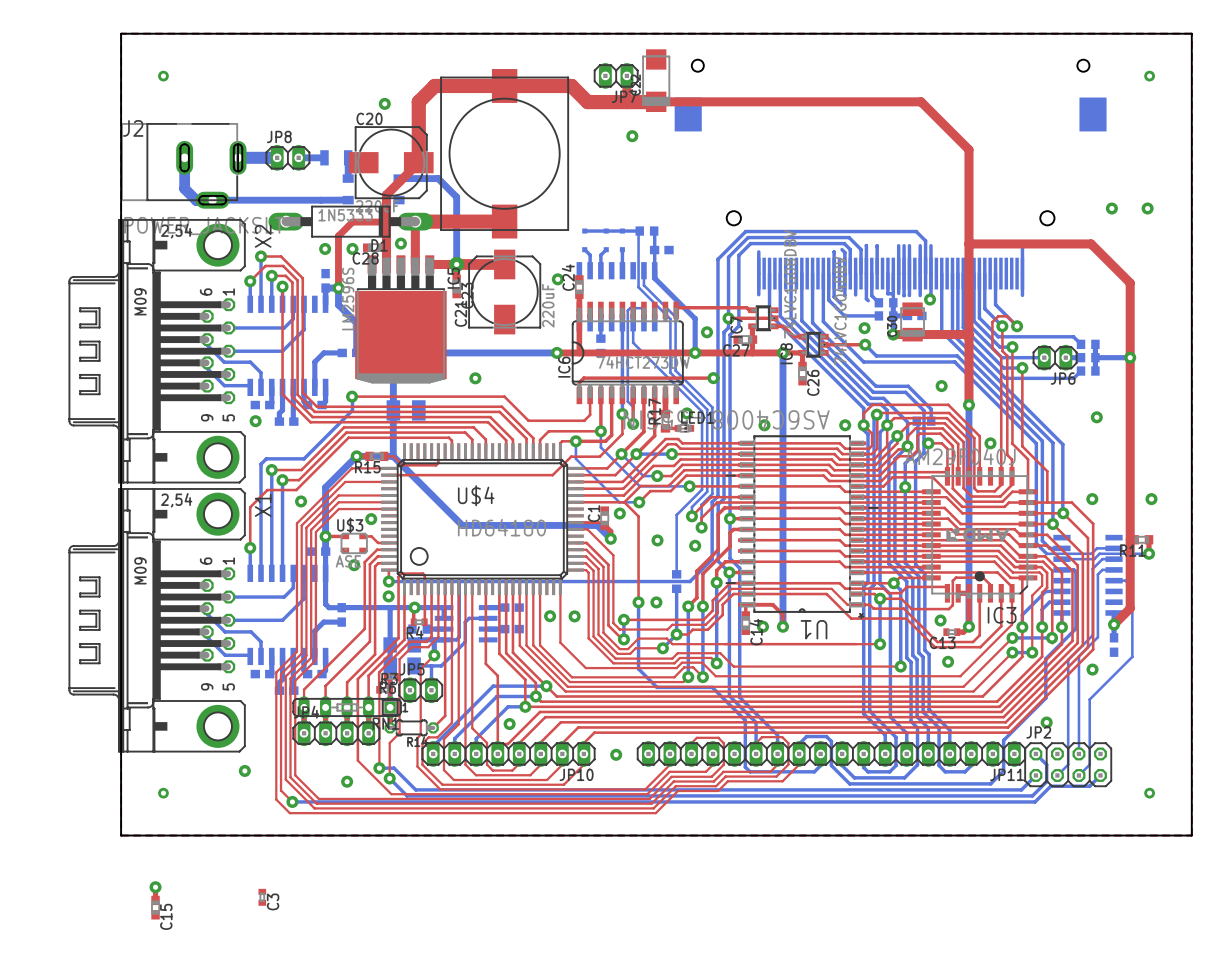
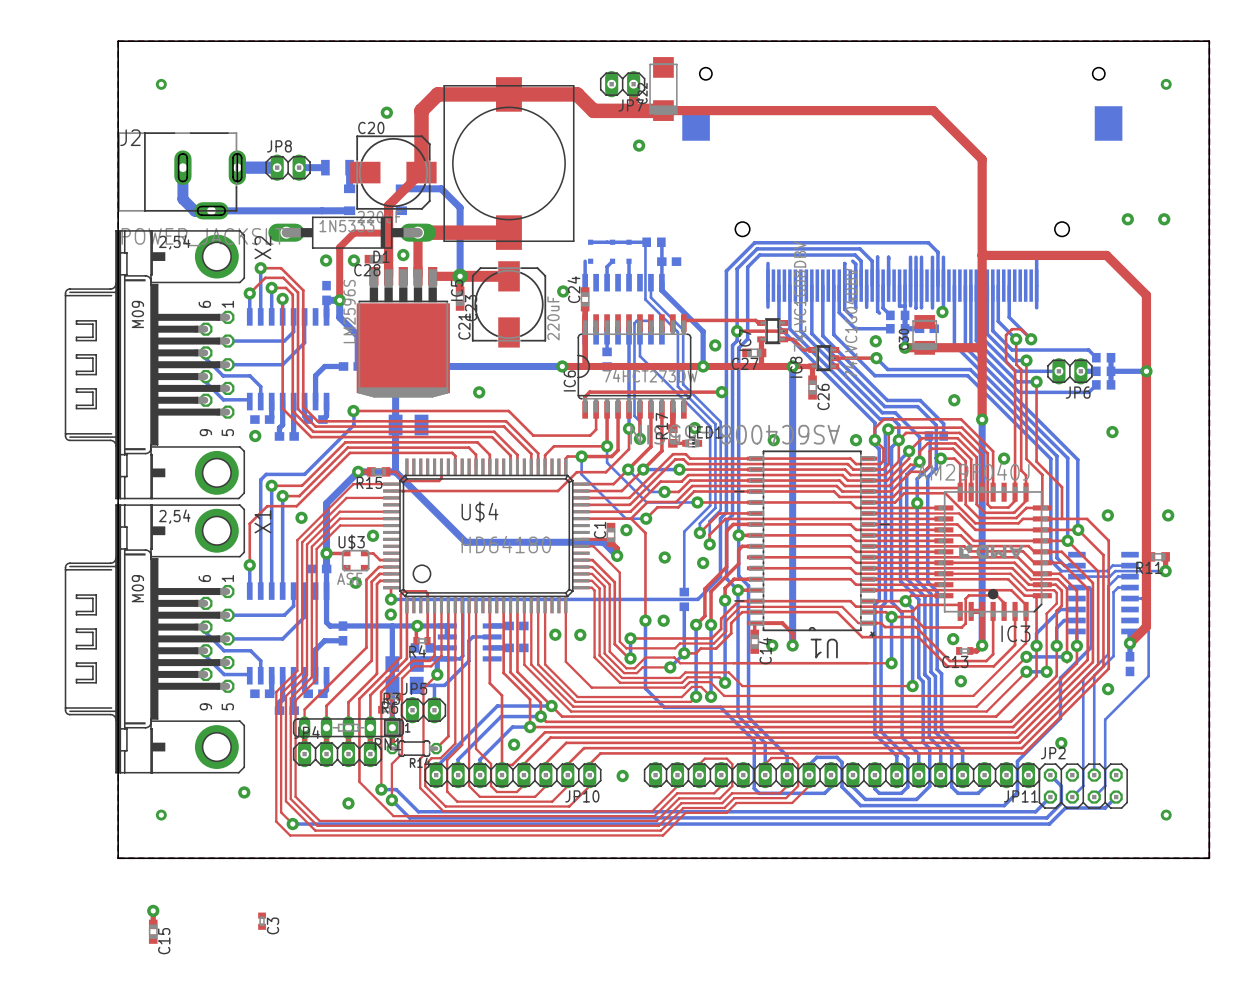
bottom track: none -> (585, 261) (585, 282)
bottom track: (584, 249) (590, 255) (590, 270) -> none

